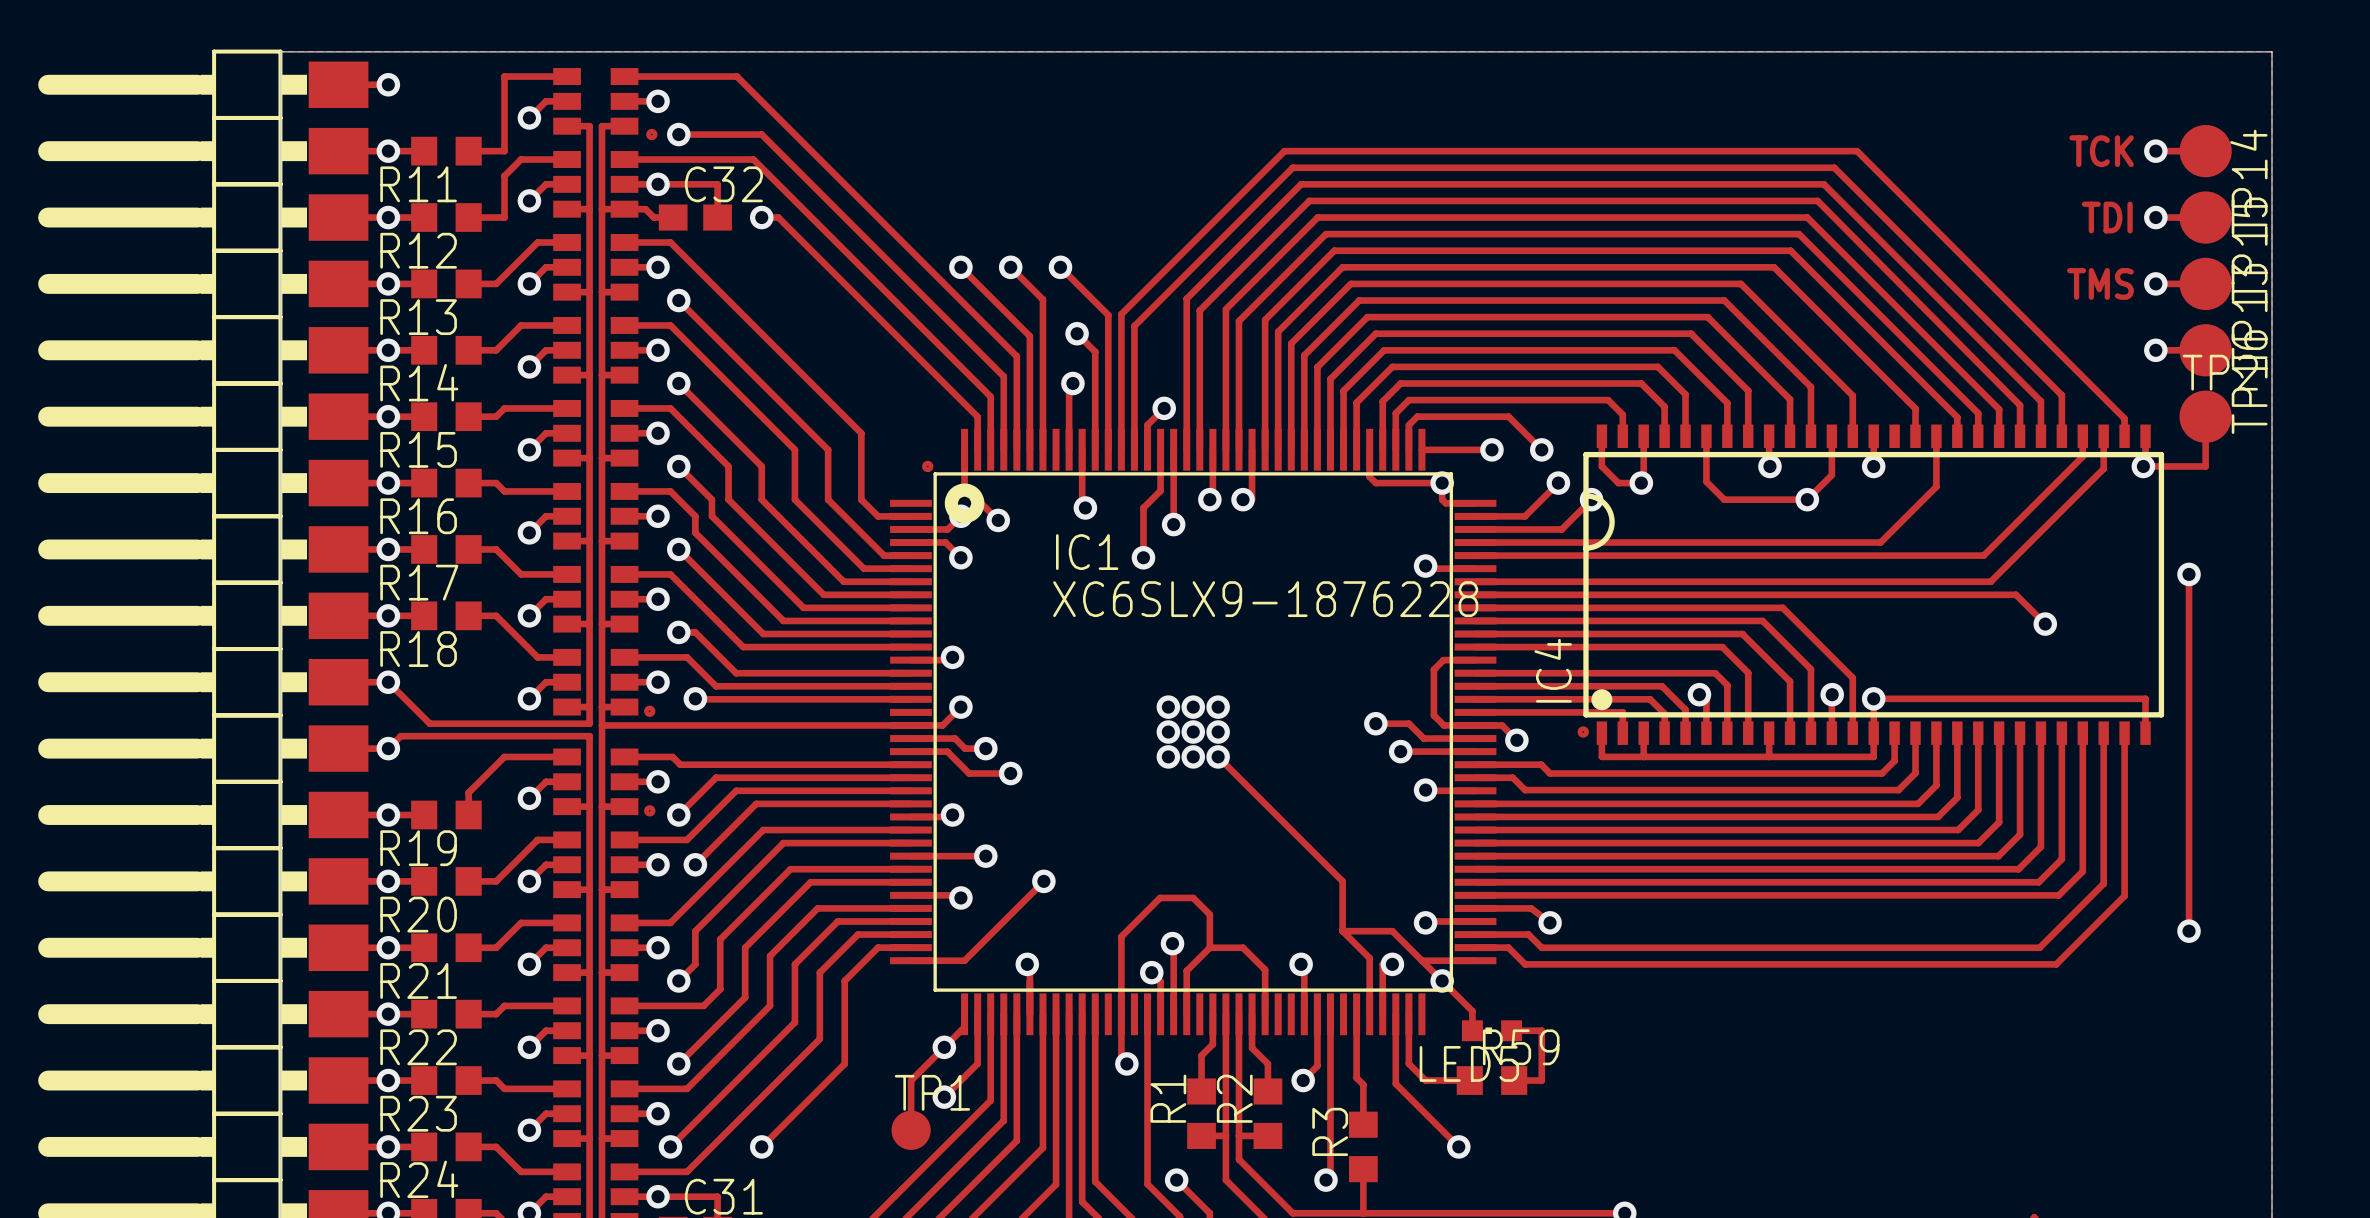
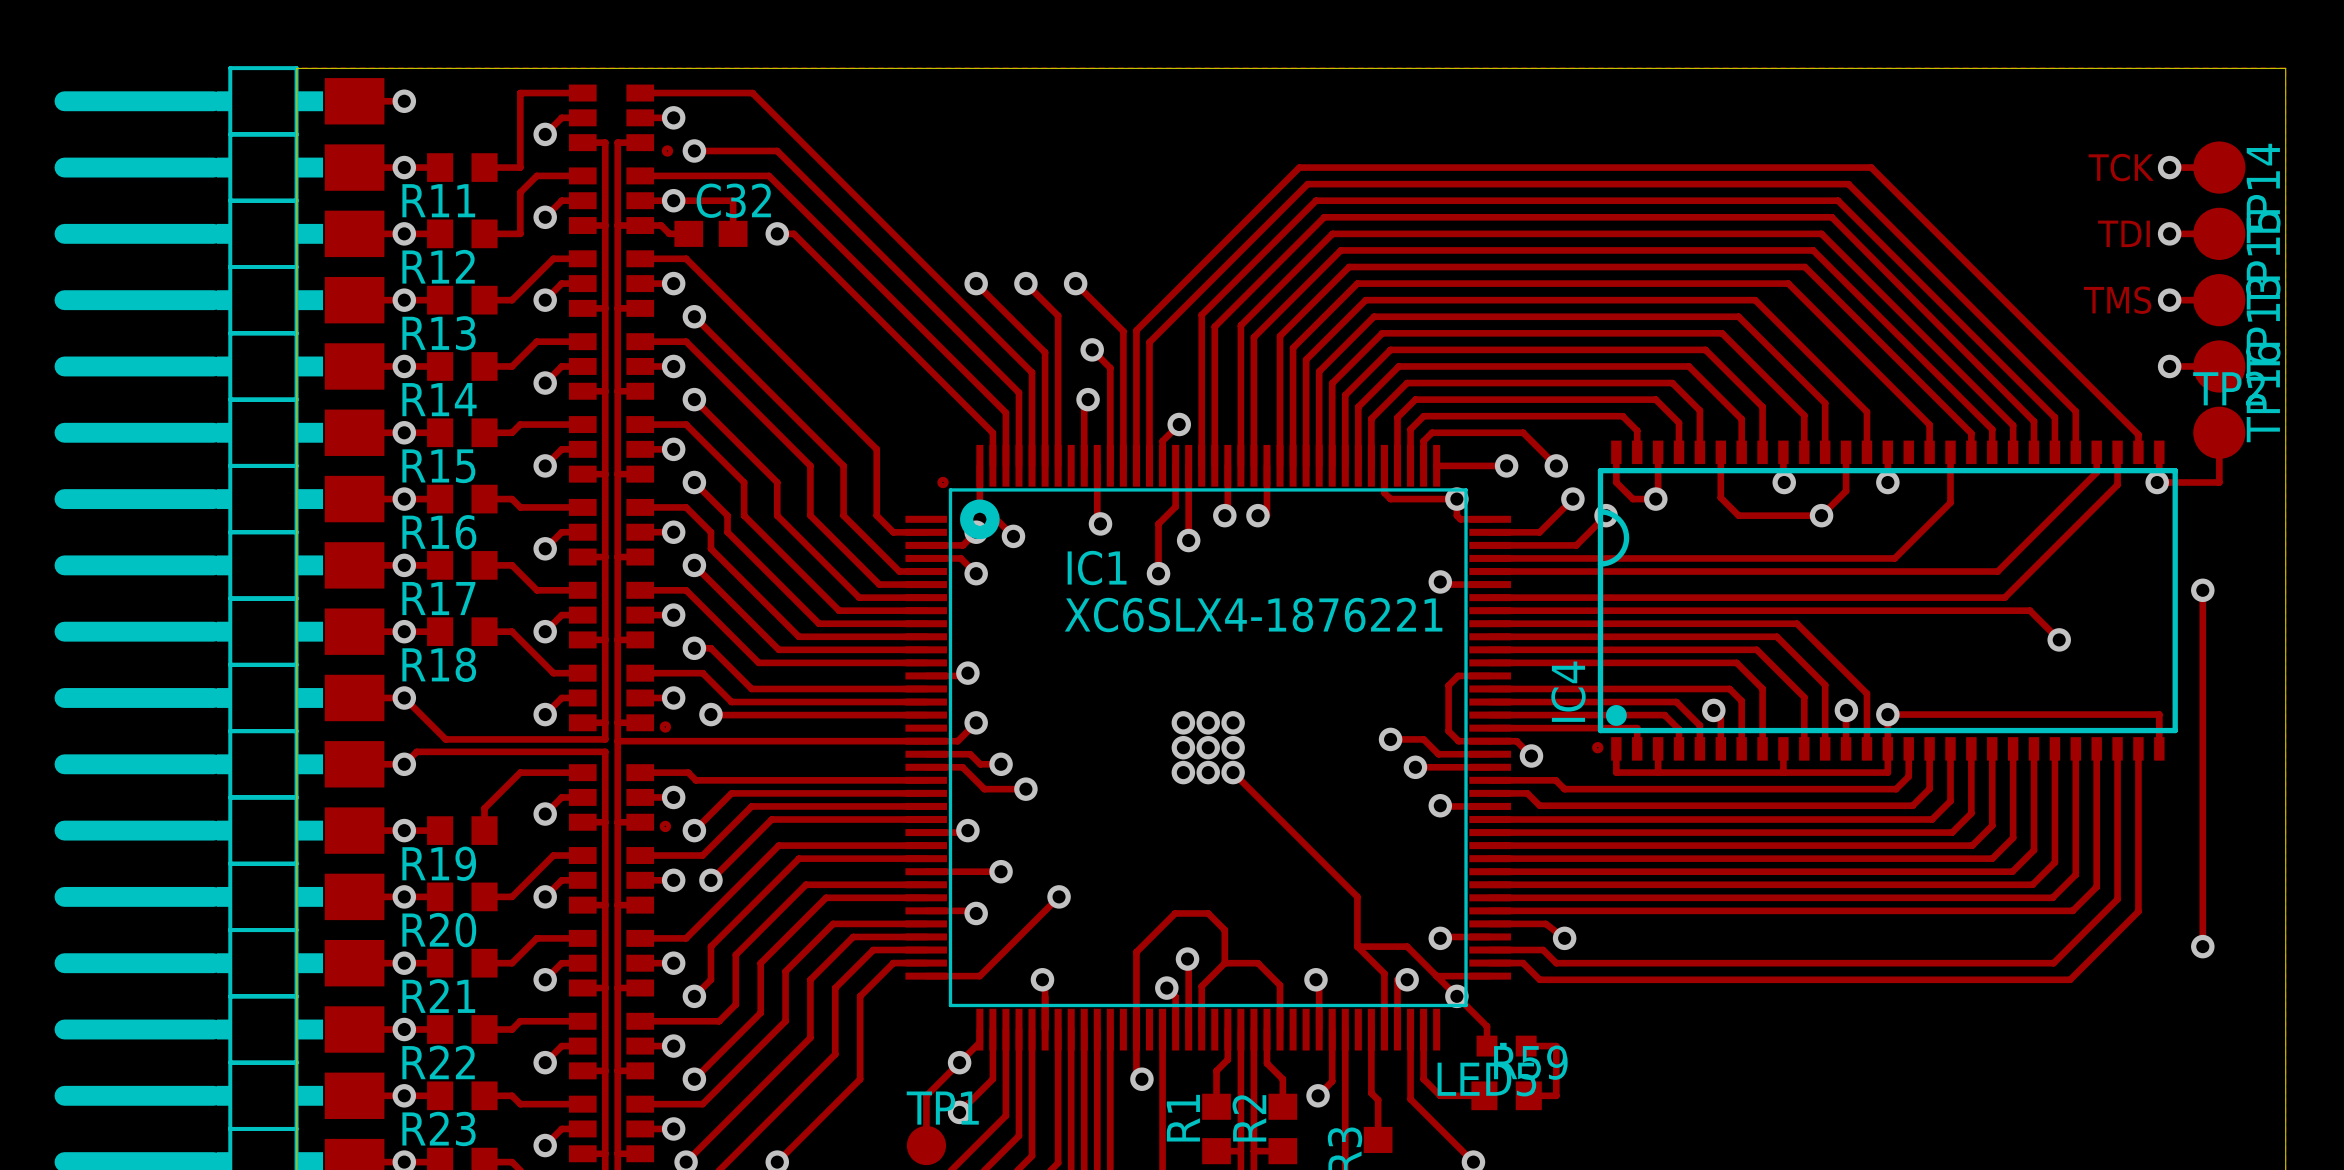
IC1 value: XC6SLX9-1876228 (1265, 599) -> XC6SLX4-1876221 (1253, 615)

